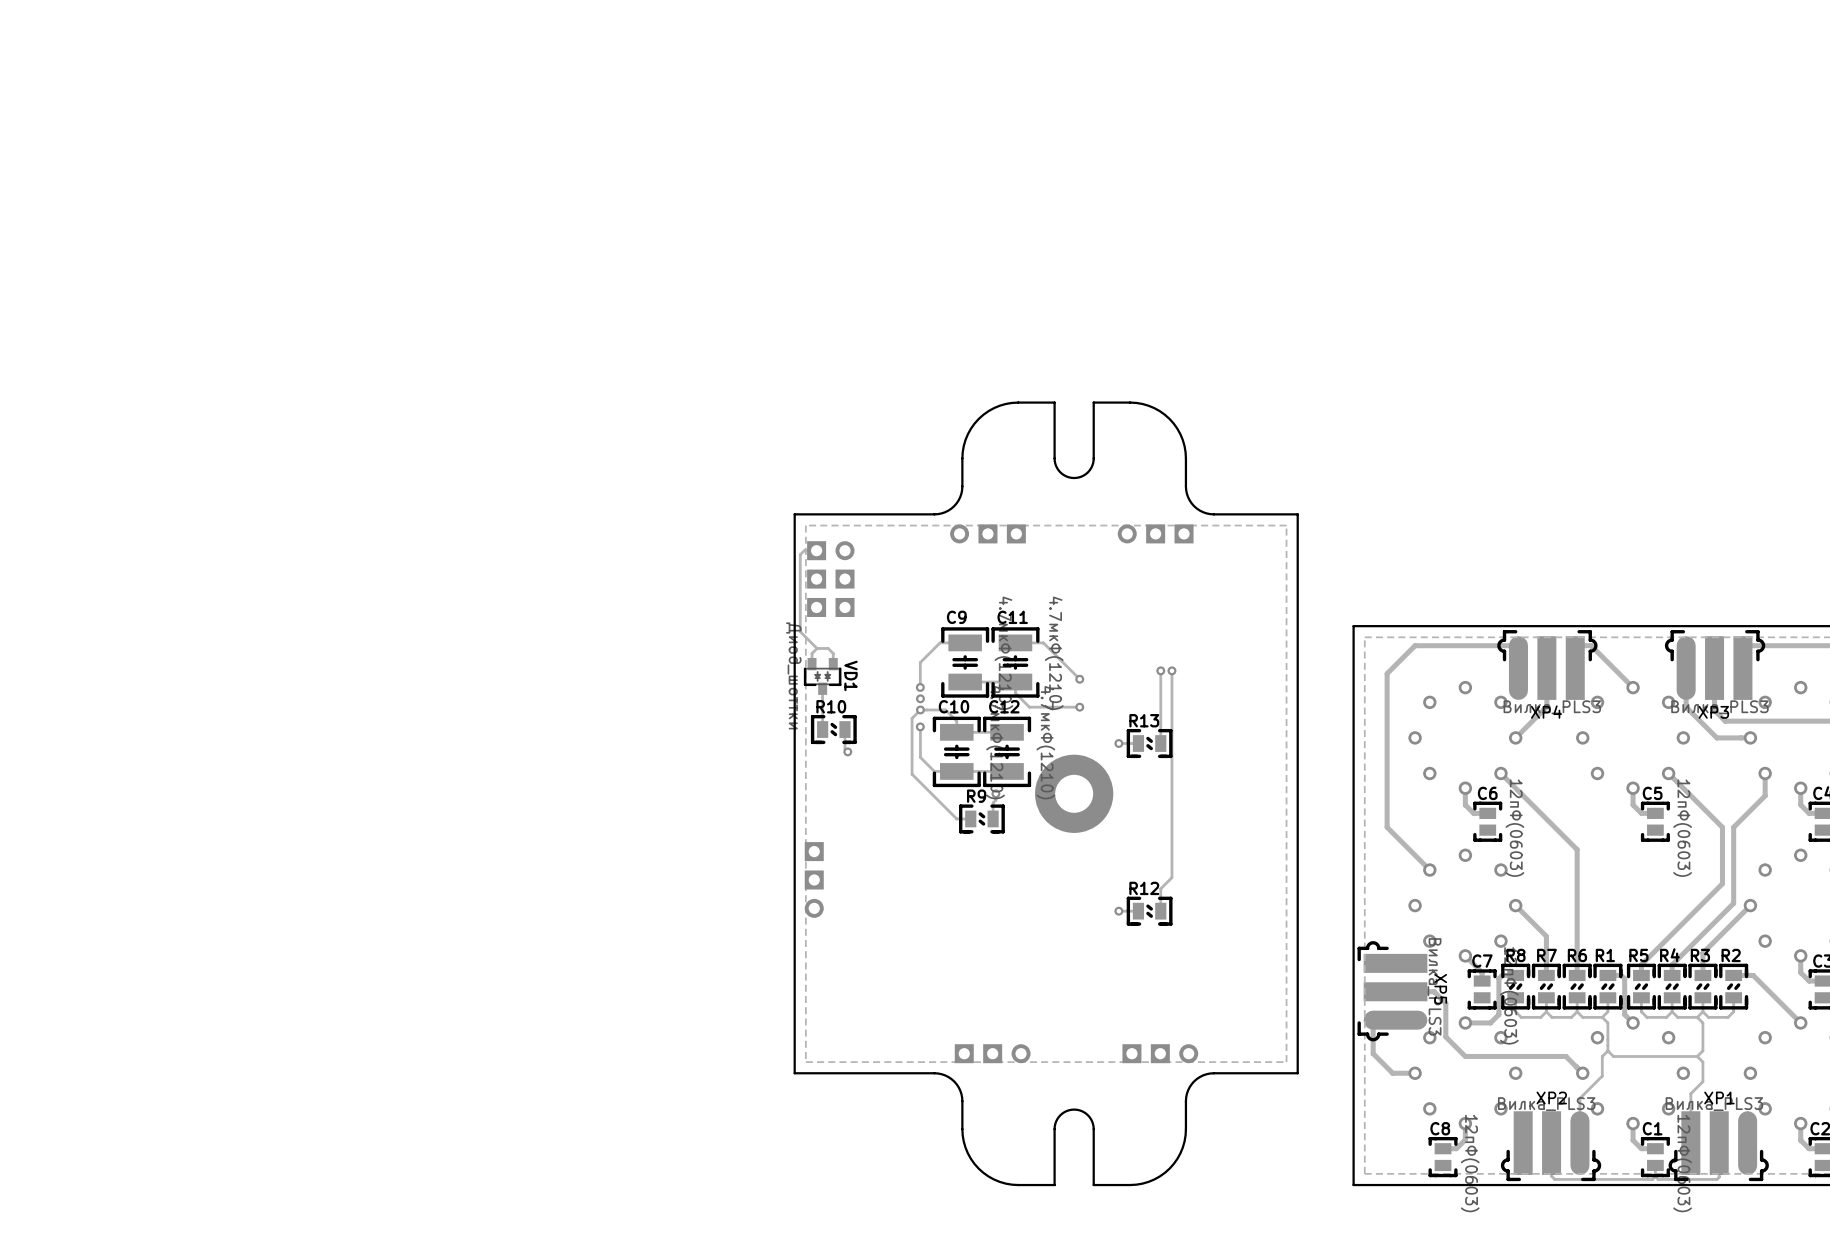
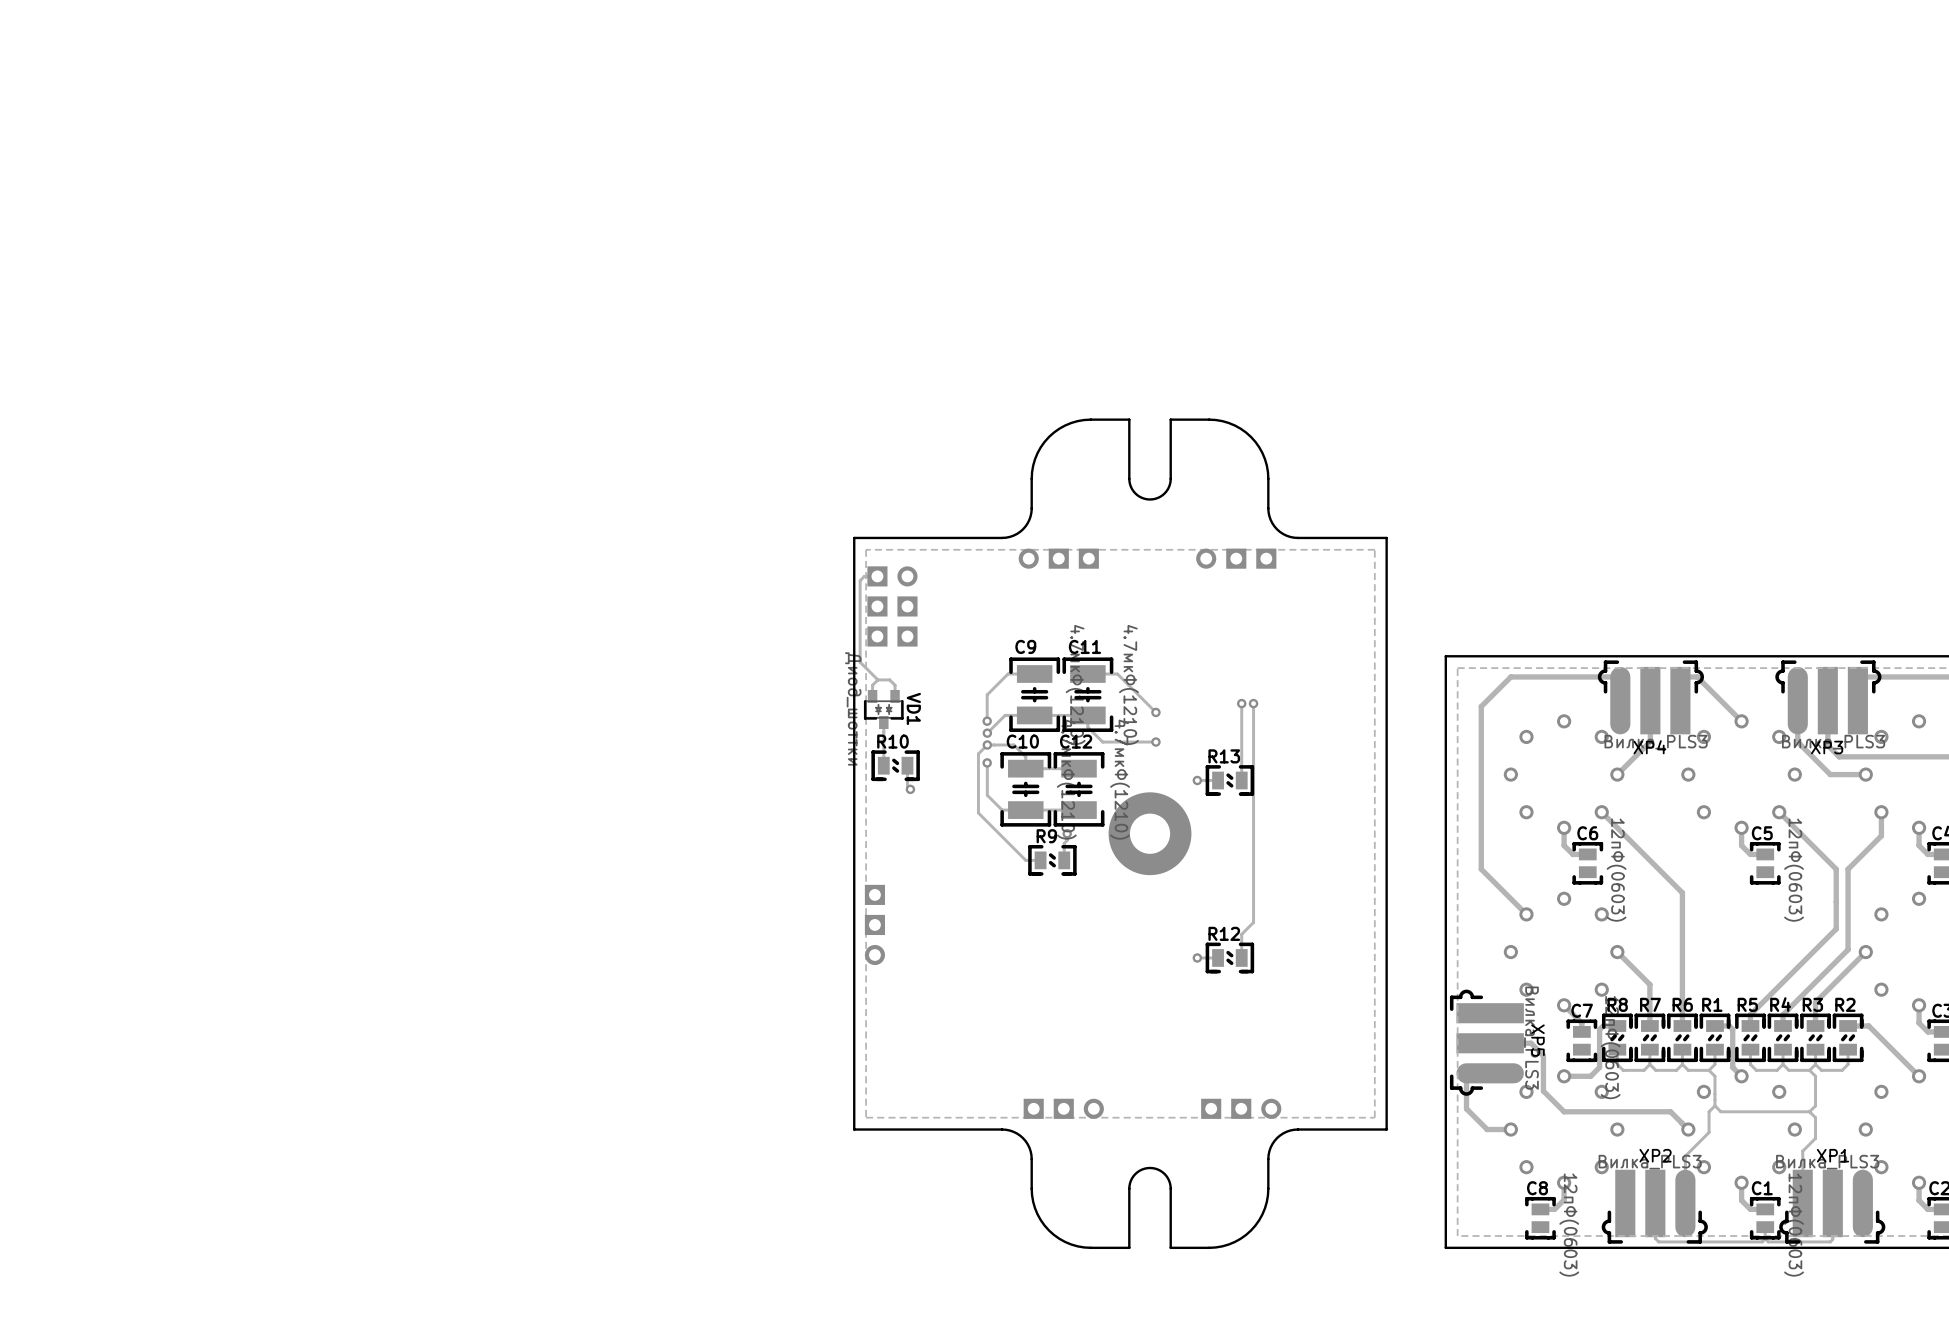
track: none -> (1025, 715) (1005, 715) (987, 733)

